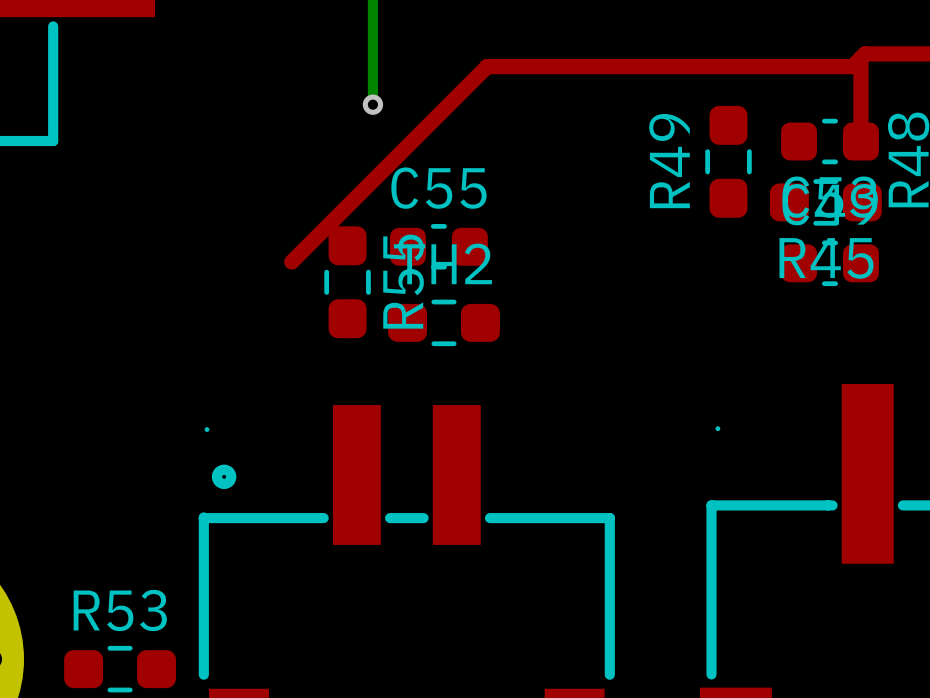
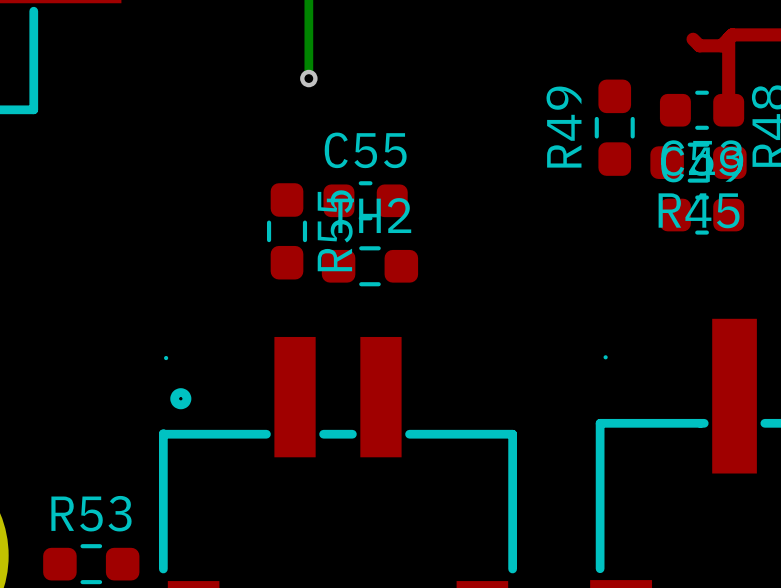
top track: (827, 66) (487, 66) (291, 261) -> (699, 45) (693, 39)

